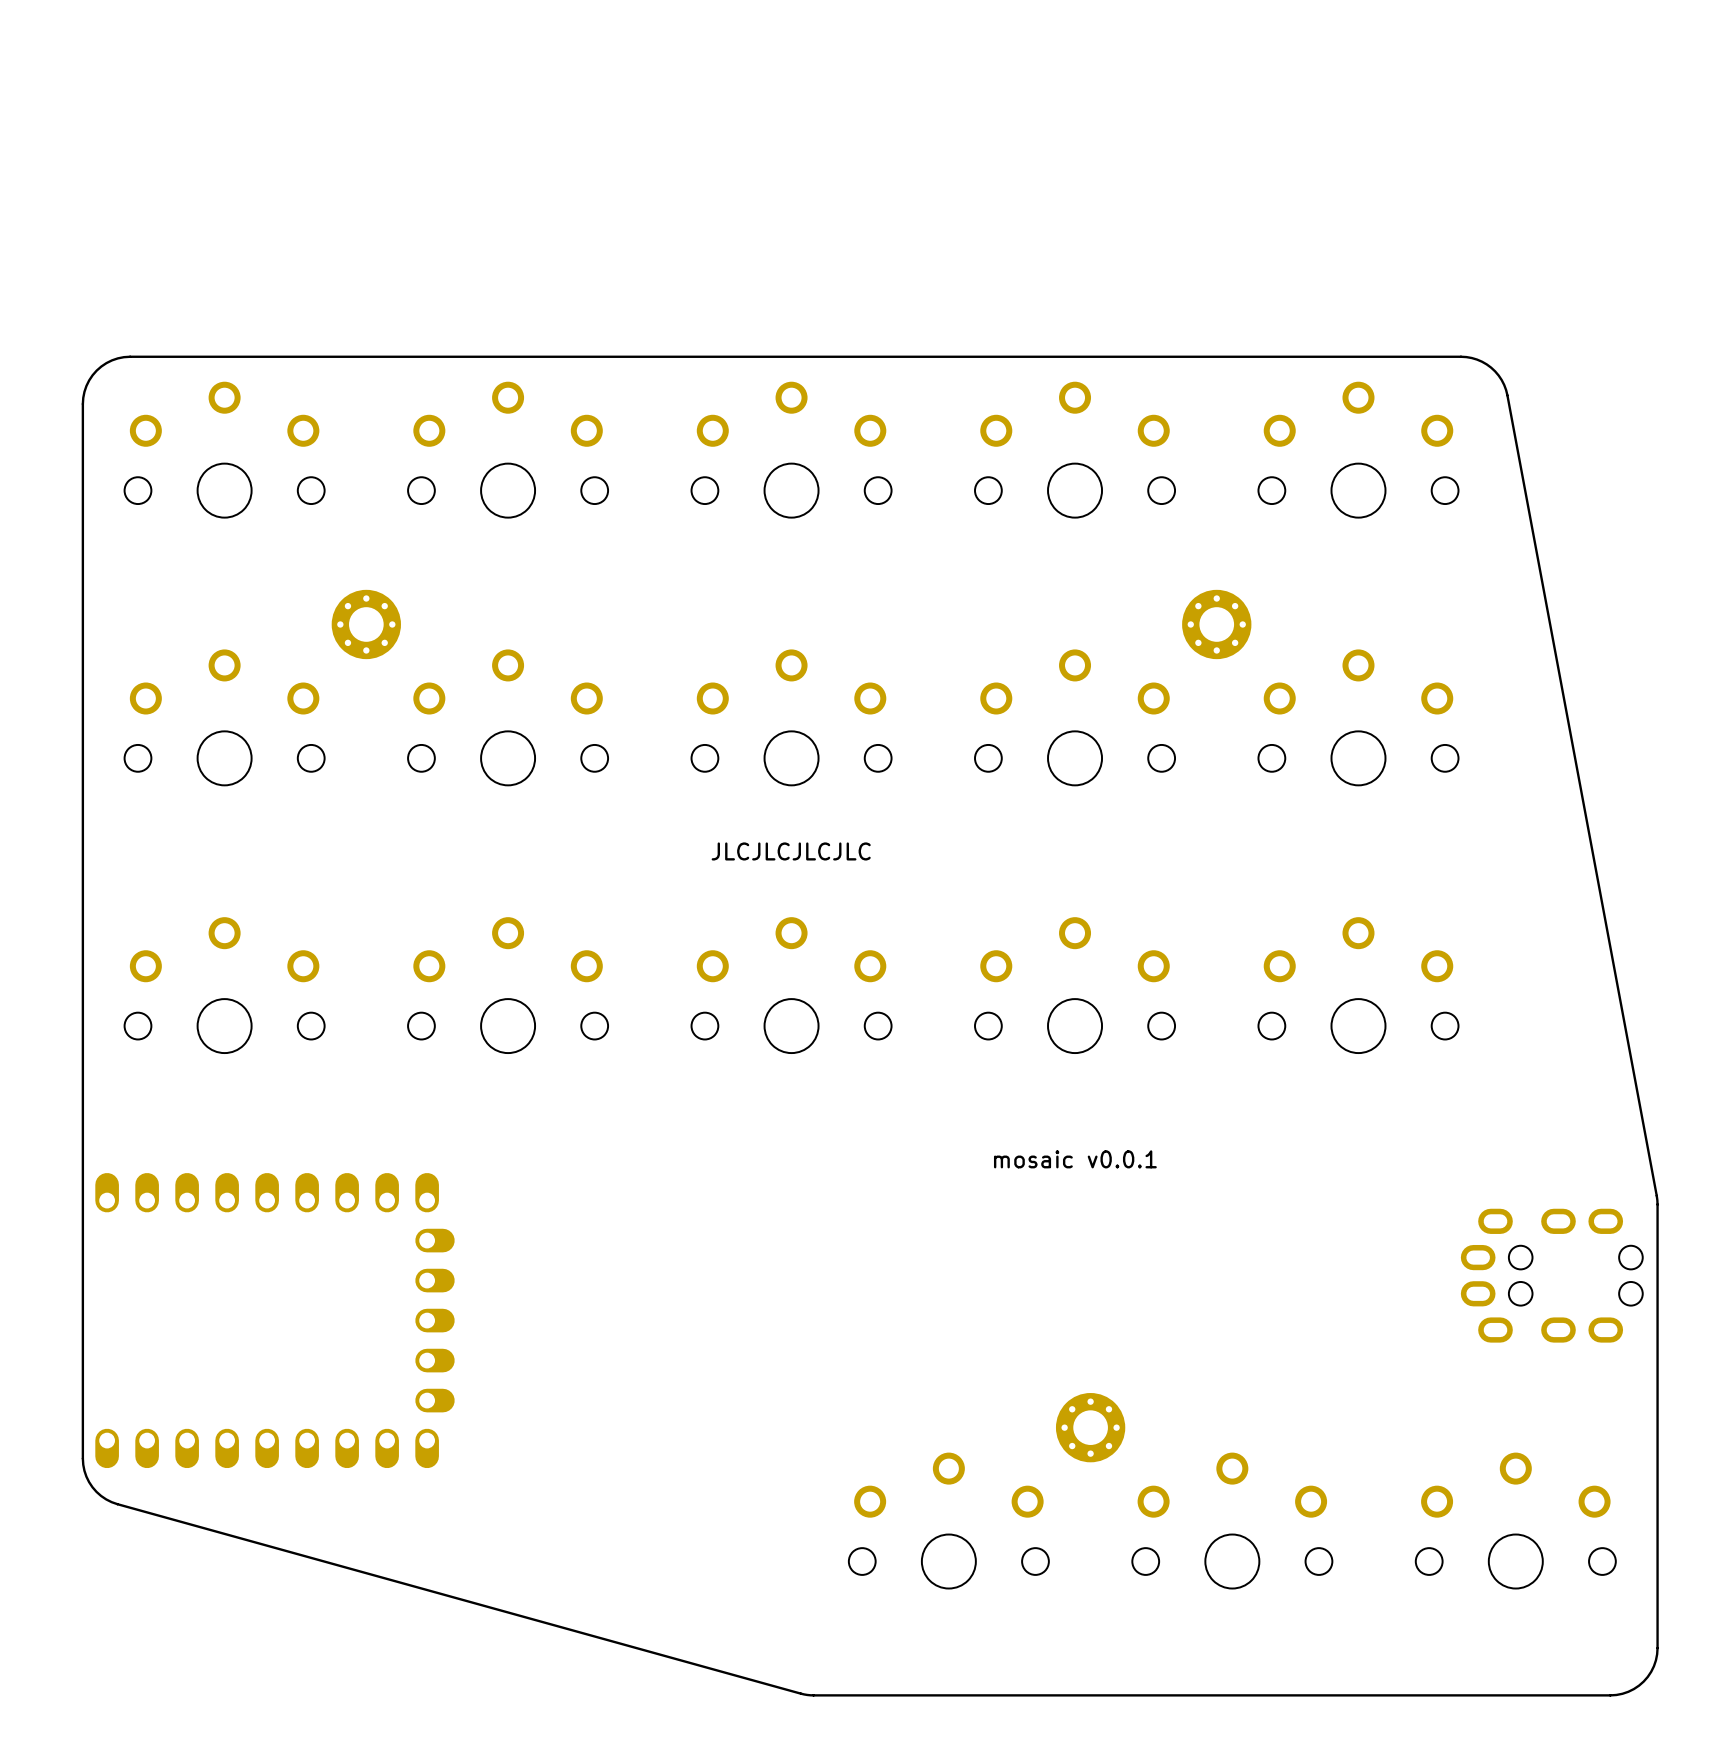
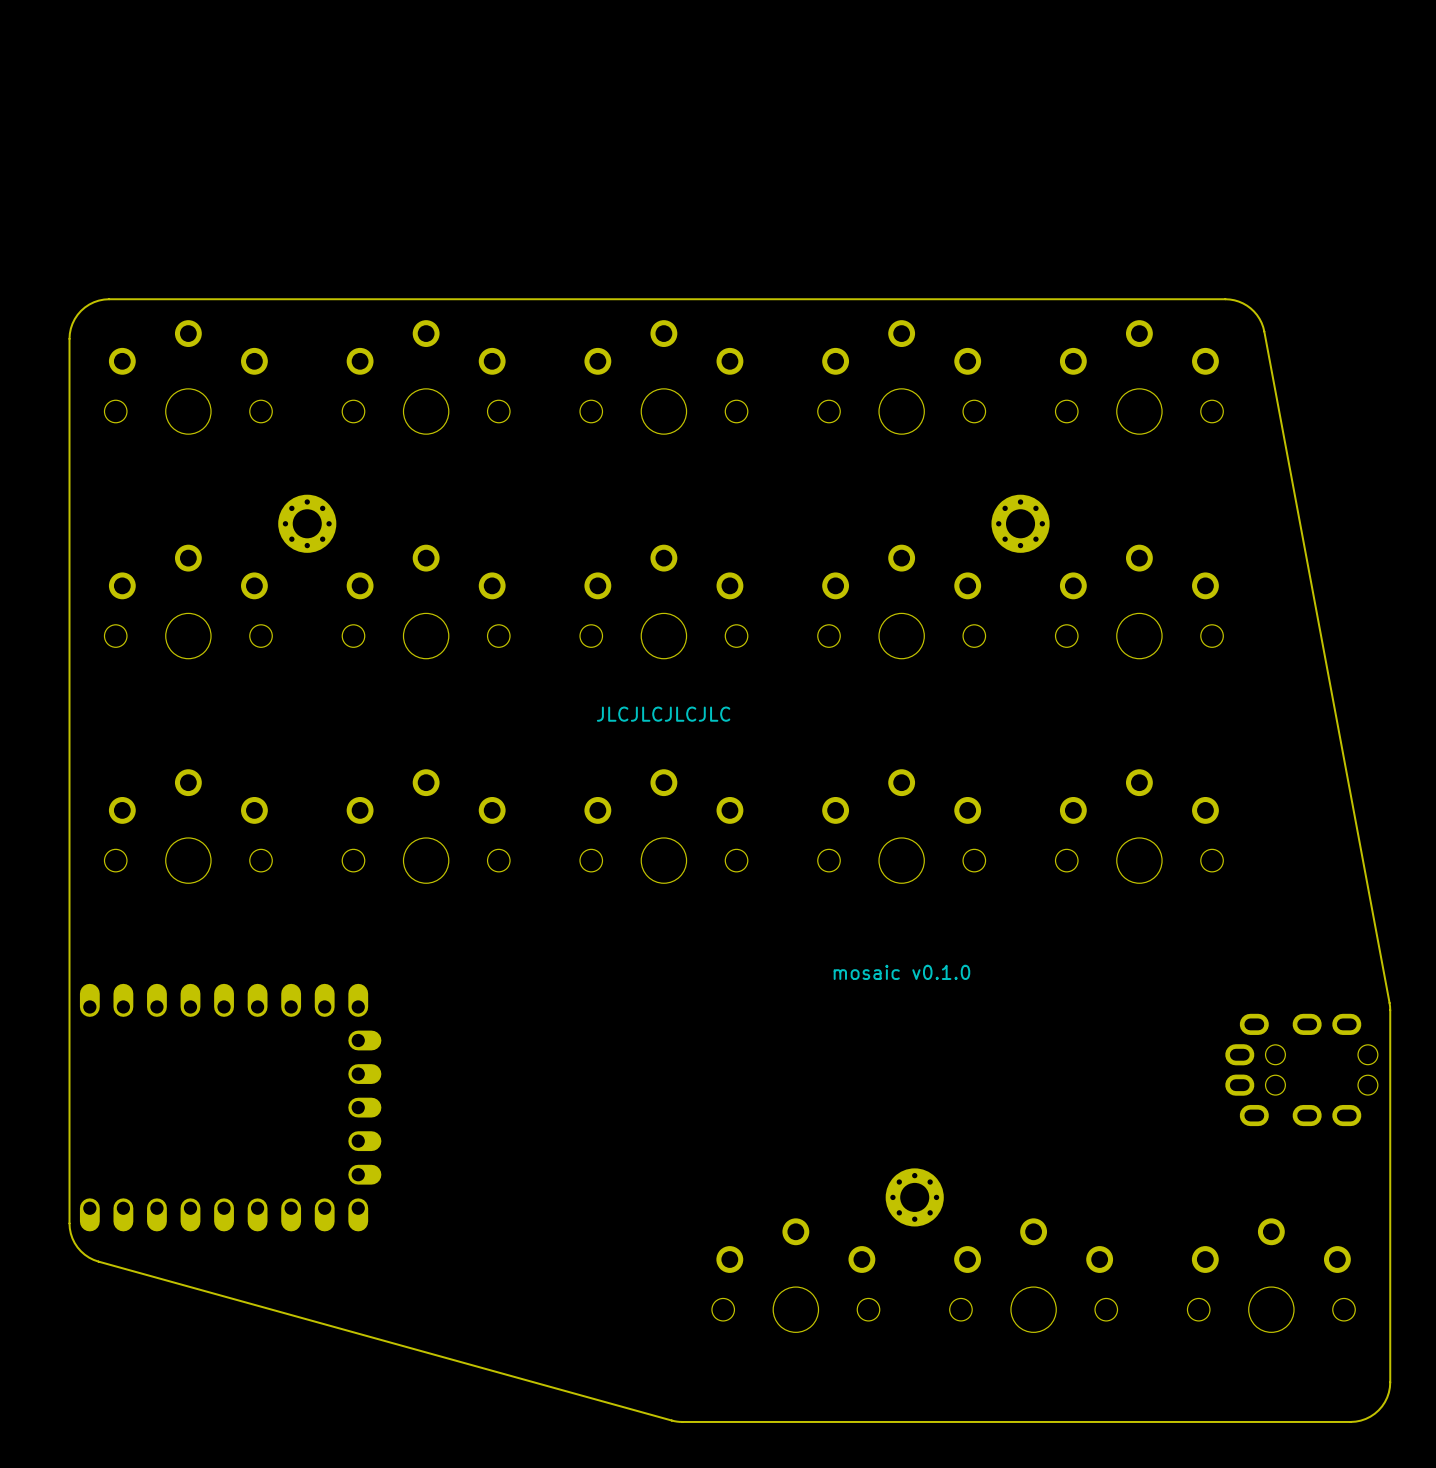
text: mosaic v0.0.1 (1075, 1159) -> mosaic v0.1.0 (901, 972)

